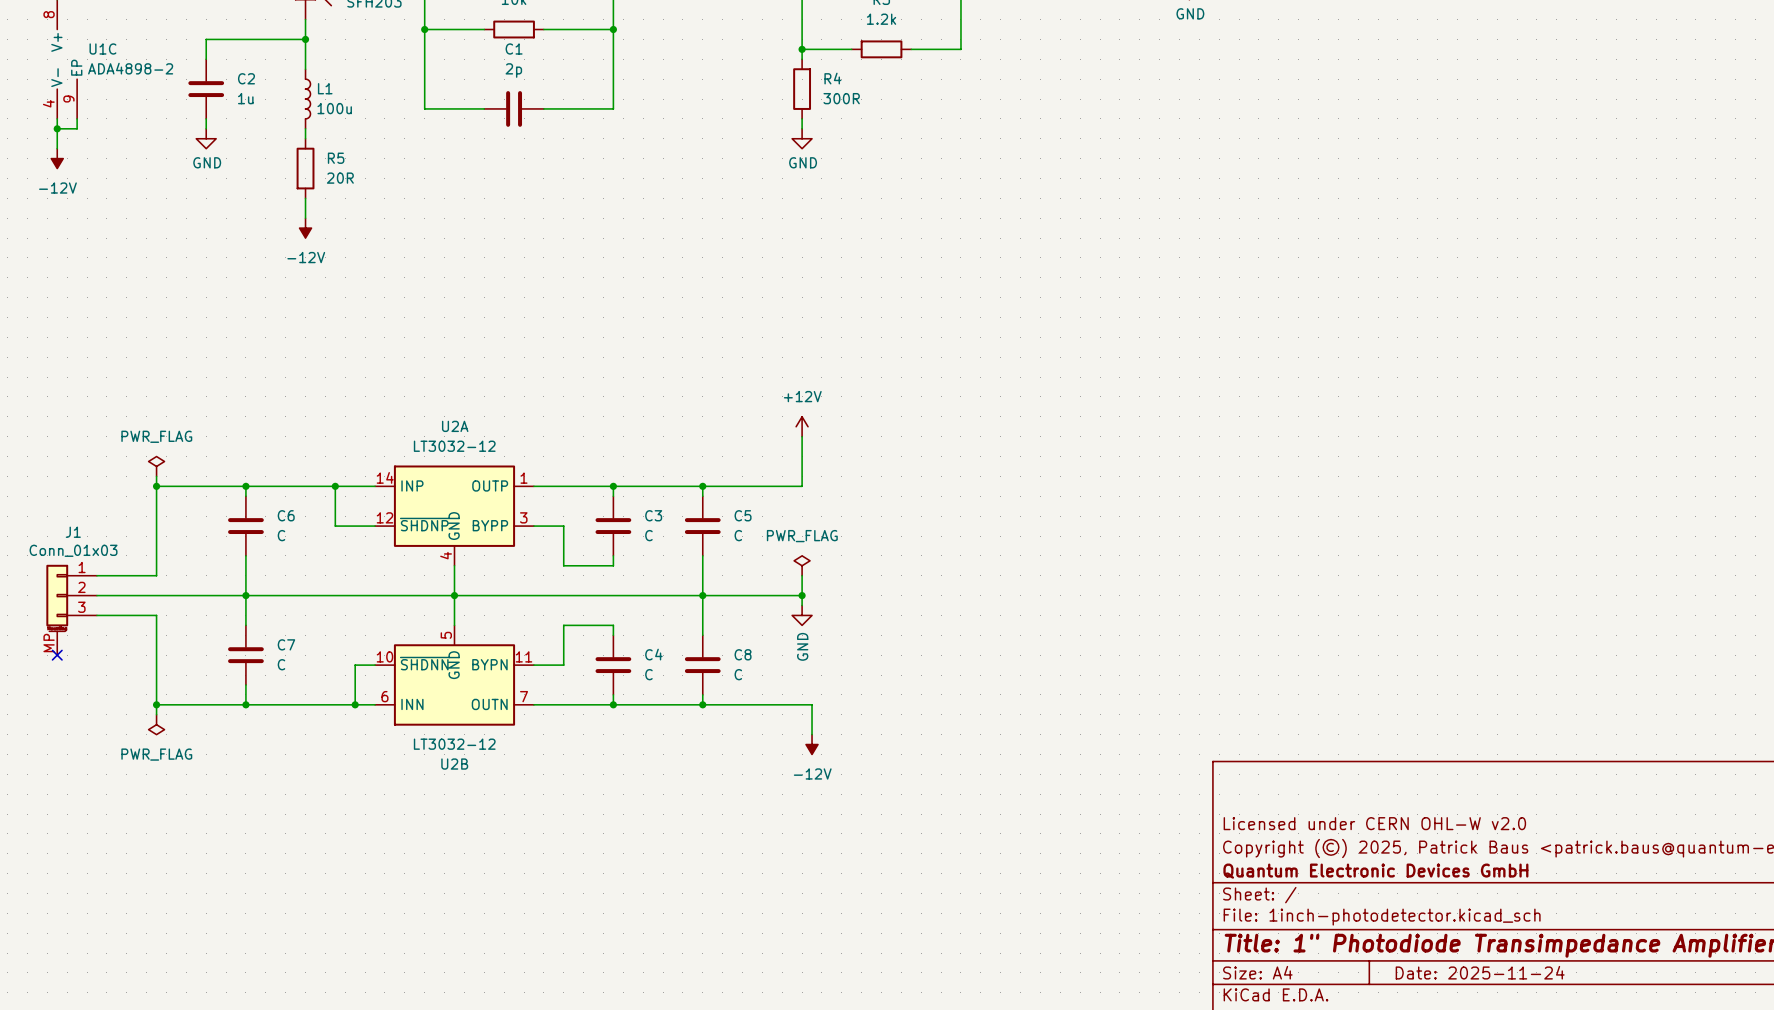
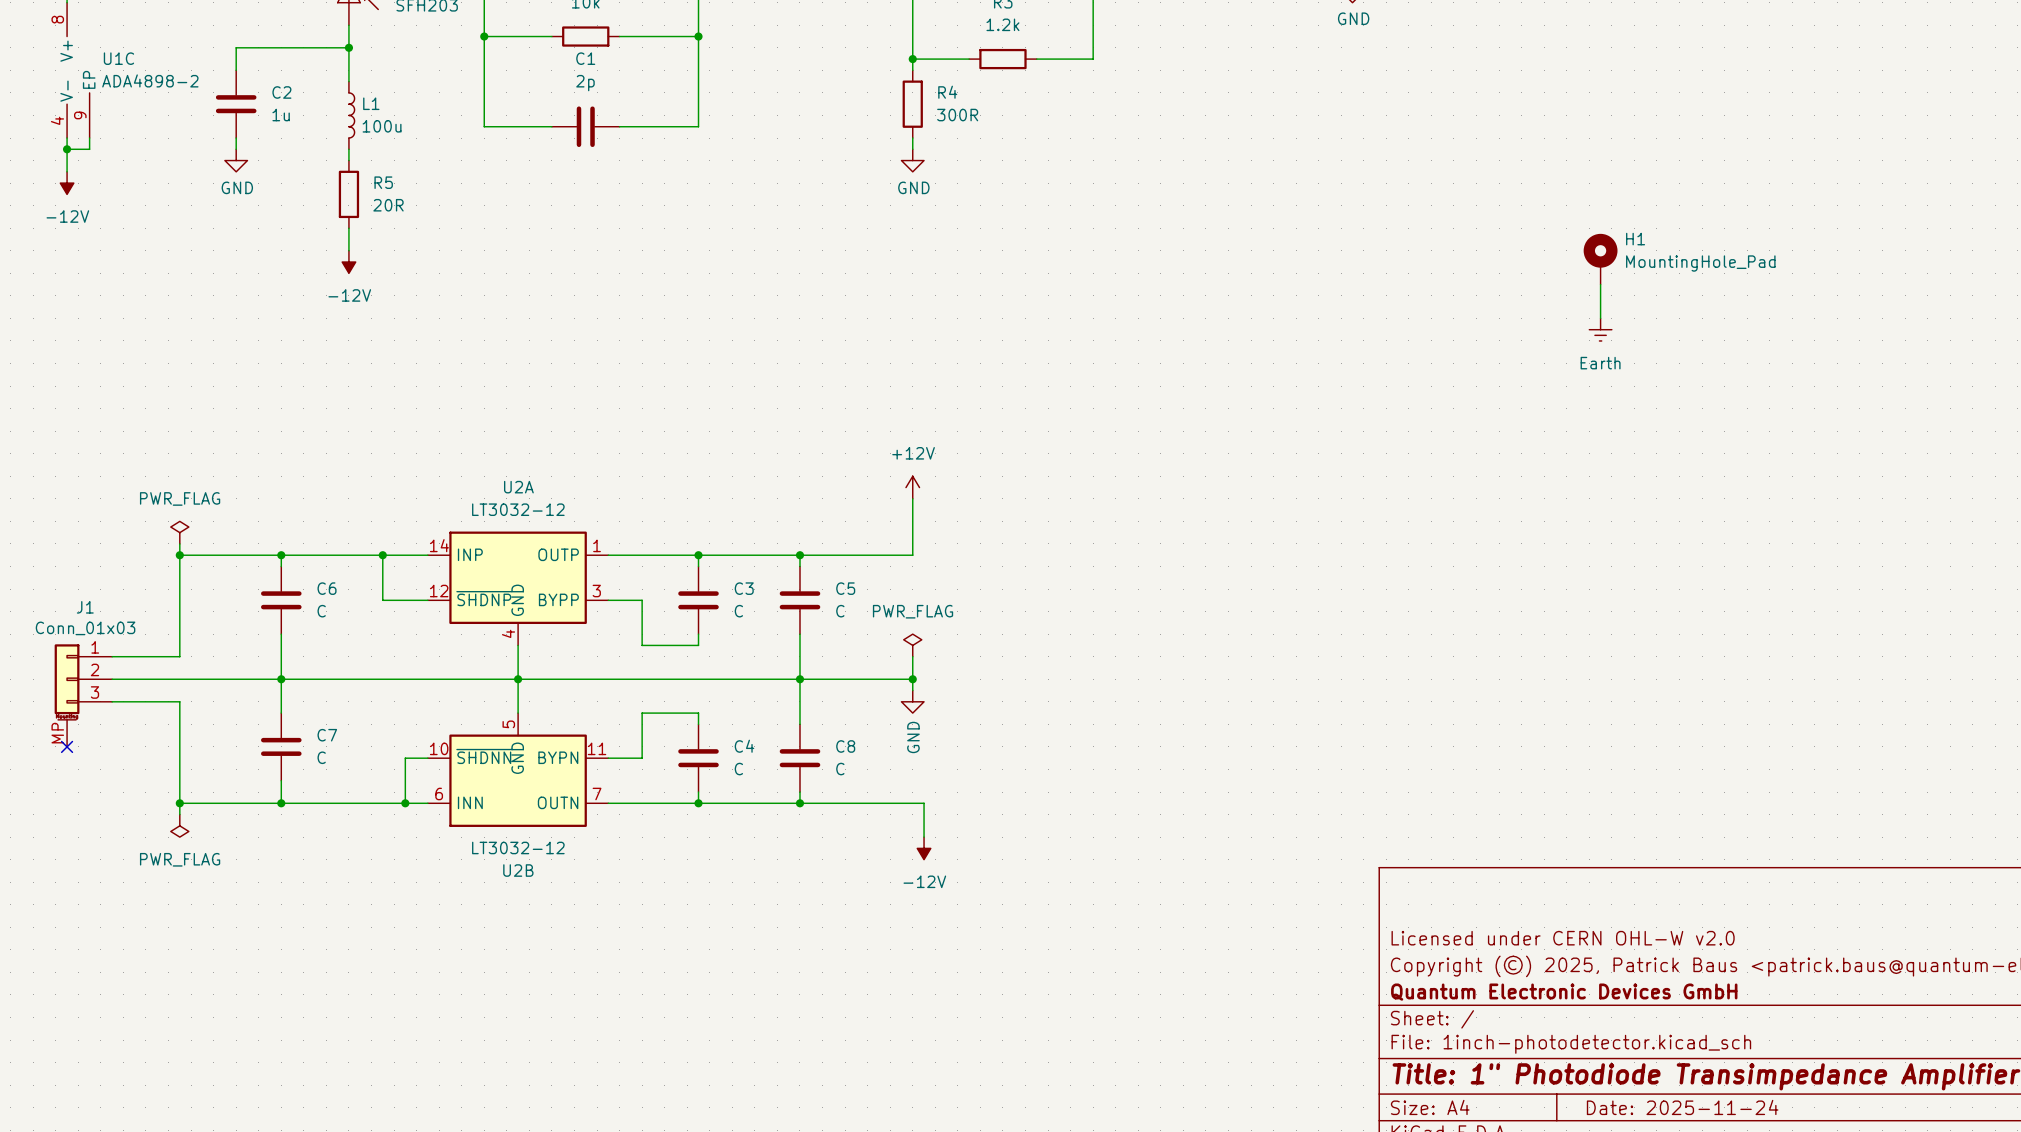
H1: none -> MountingHole_Pad (1600, 259)
wire: none -> (1600, 284) (1600, 318)
power symbol: none -> Earth (1600, 329)

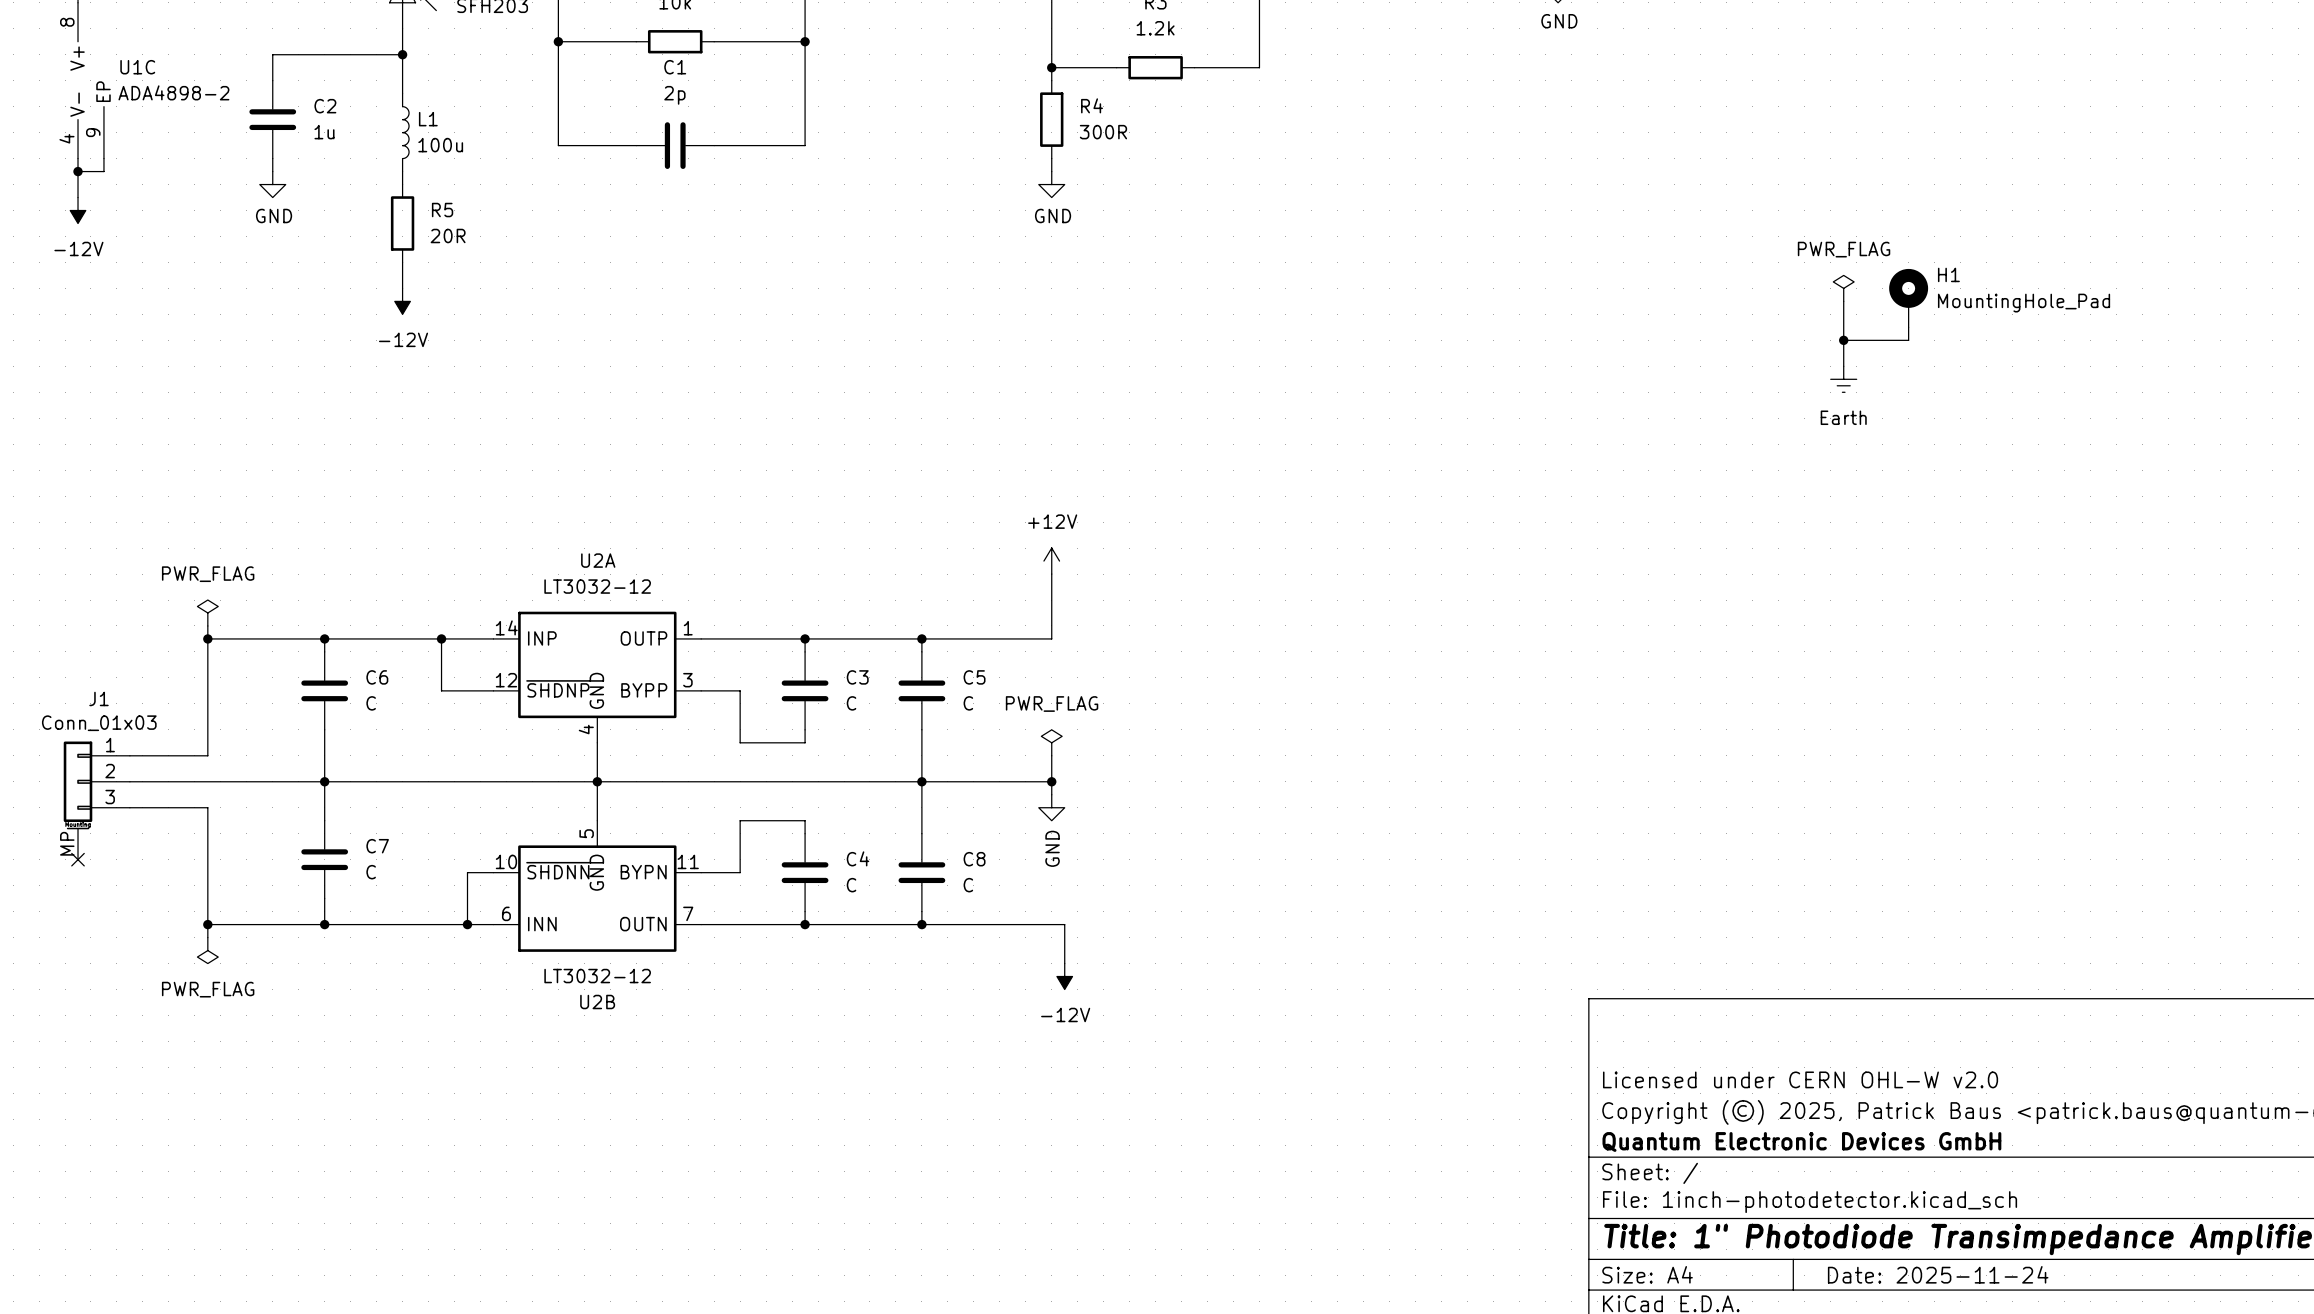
power symbol: none -> PWR_FLAG (1843, 288)
H1 position: (1600, 259) -> (1908, 298)
wire: none -> (1908, 327) (1908, 340) (1843, 340)
junction: none -> (1843, 340)

